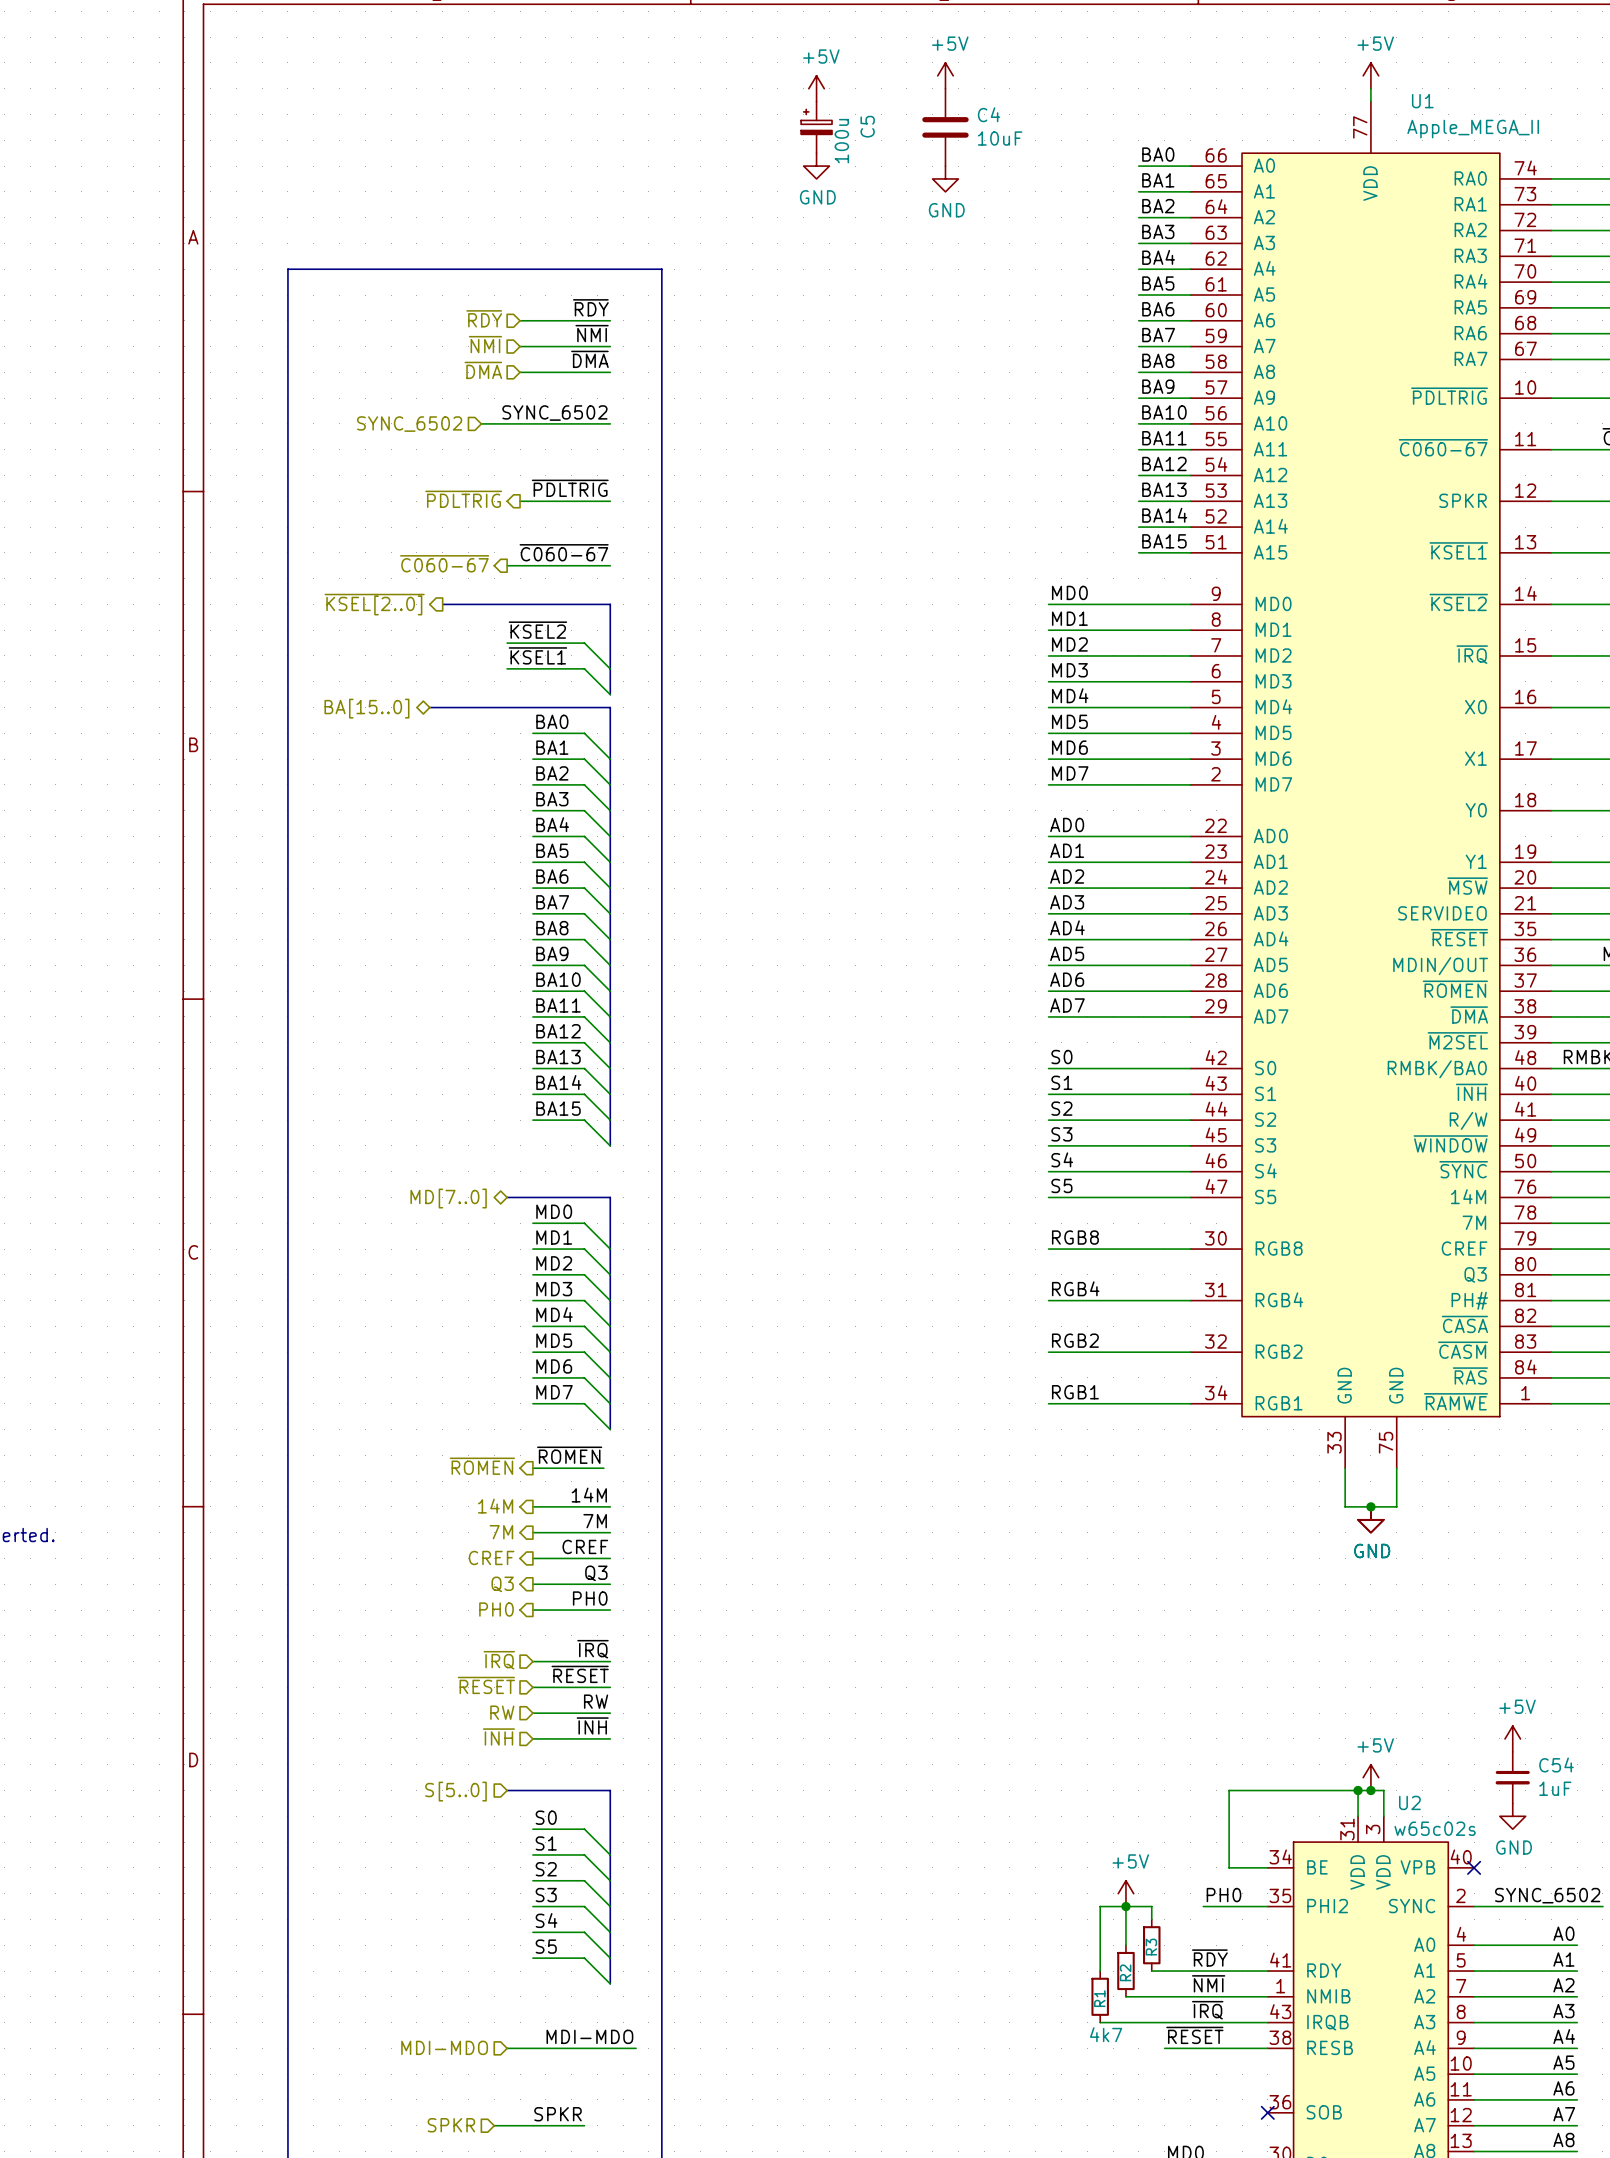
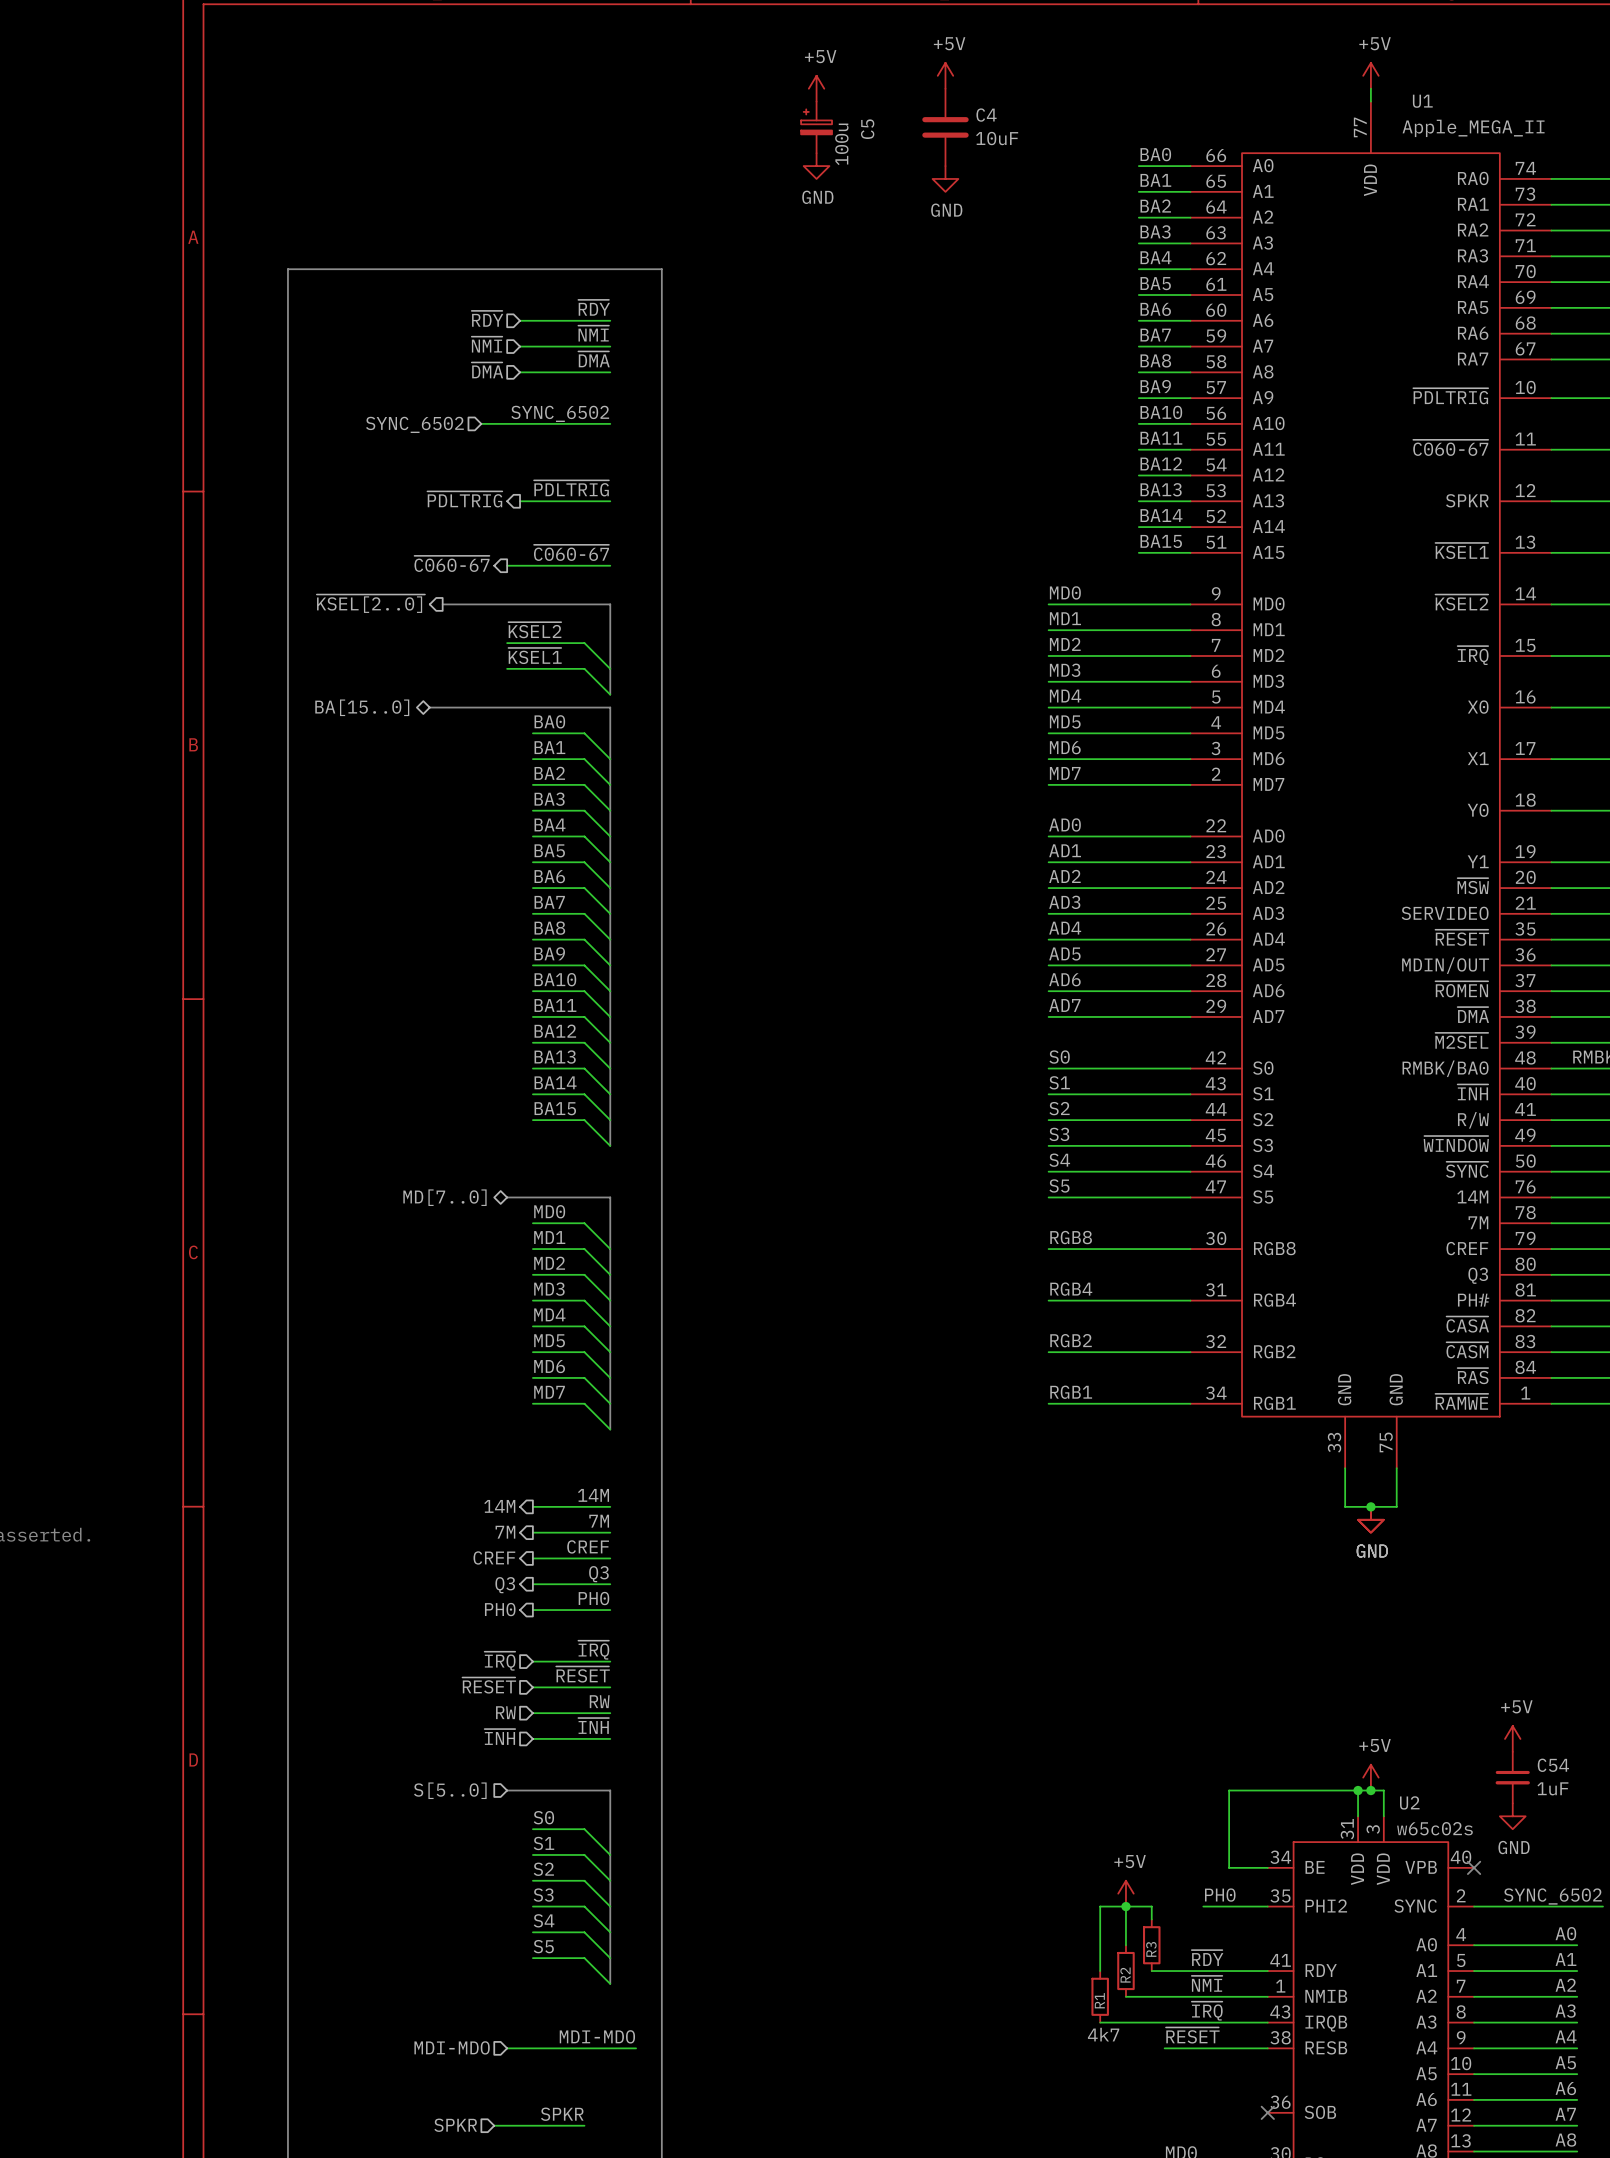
label: ~{ROMEN} (569, 1455) -> none
hierarchical label: ~{ROMEN} (482, 1466) -> none
wire: (532, 1468) (603, 1468) -> none

